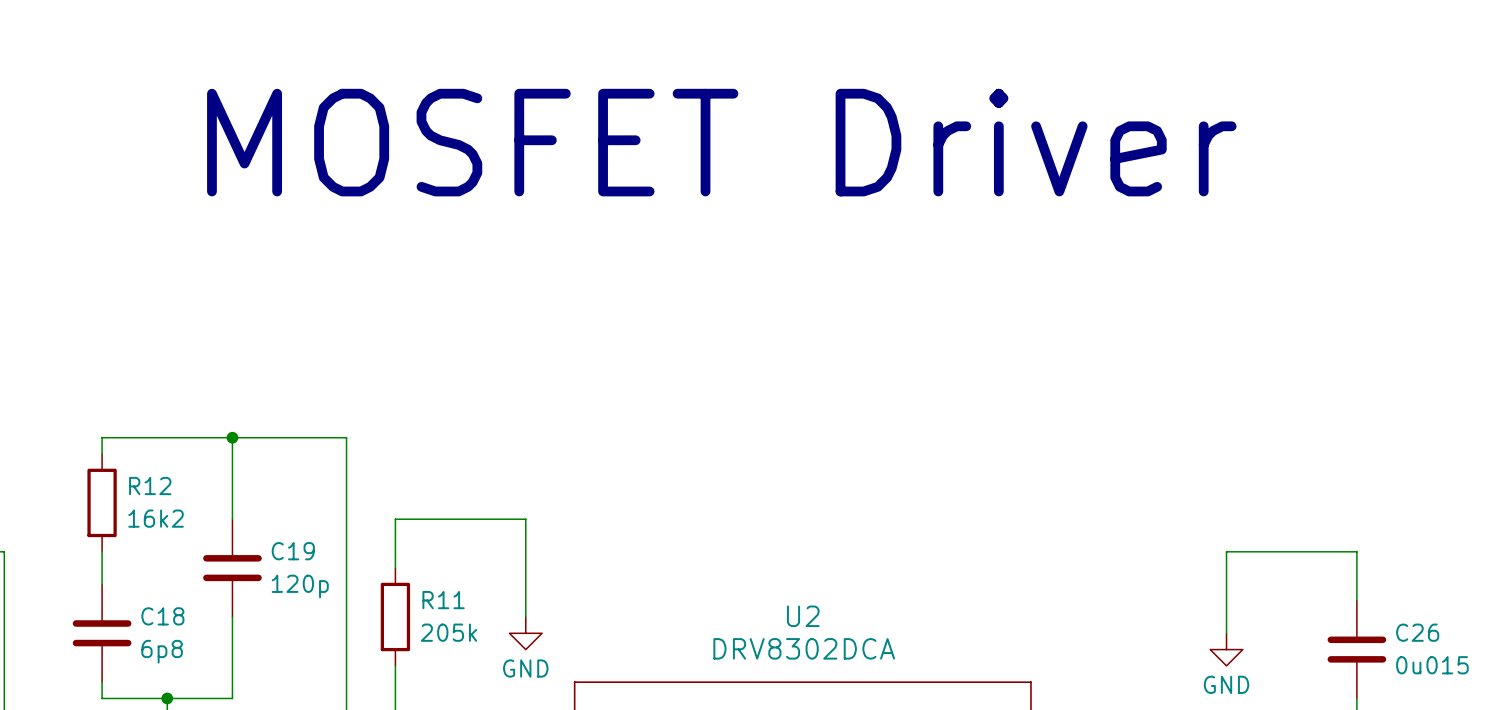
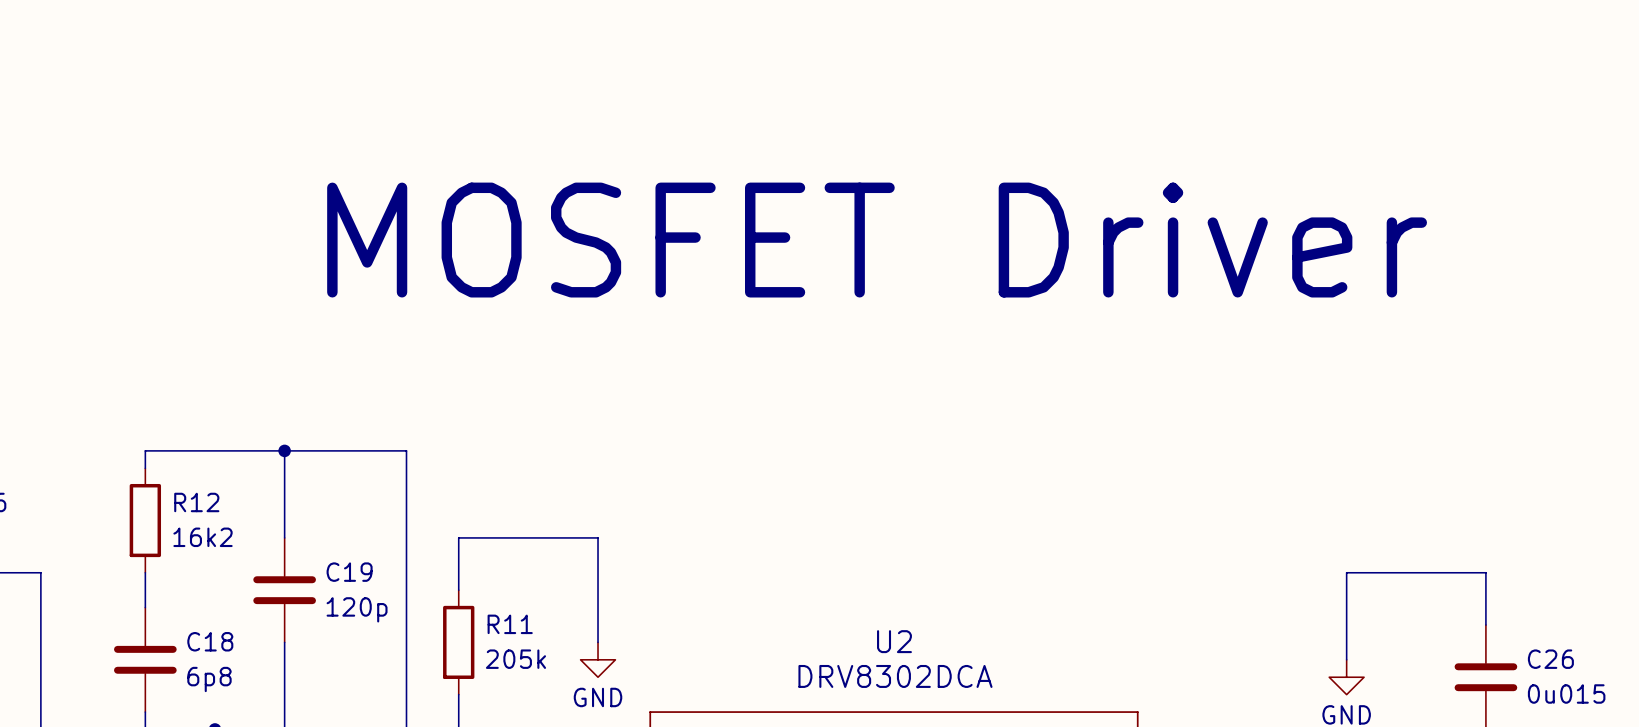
text position: MOSFET Driver (721, 142) -> MOSFET Driver (877, 240)

